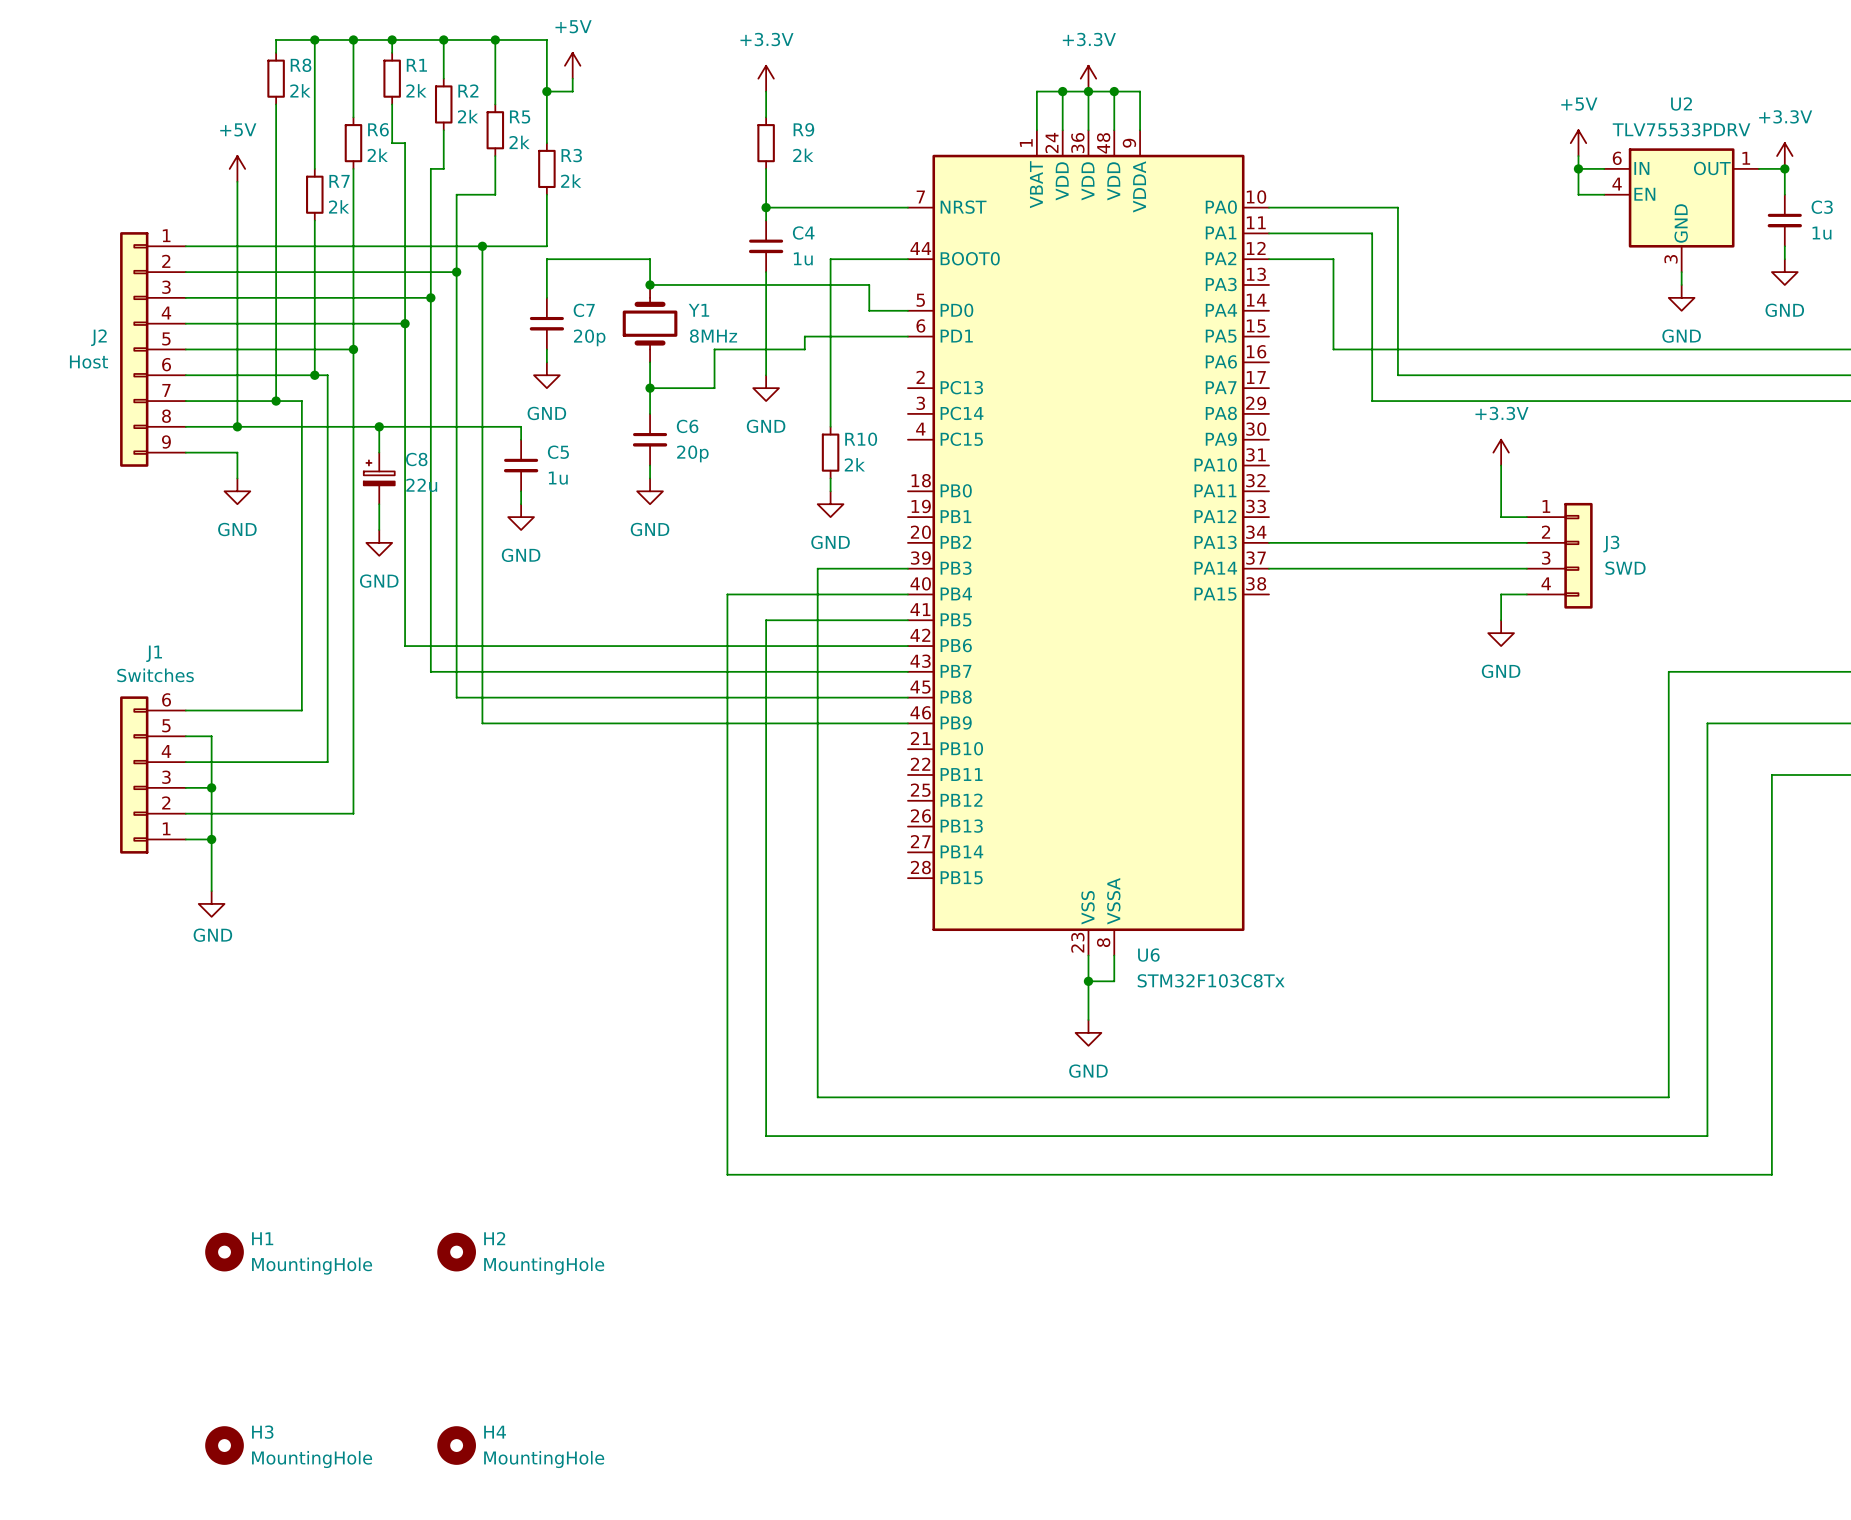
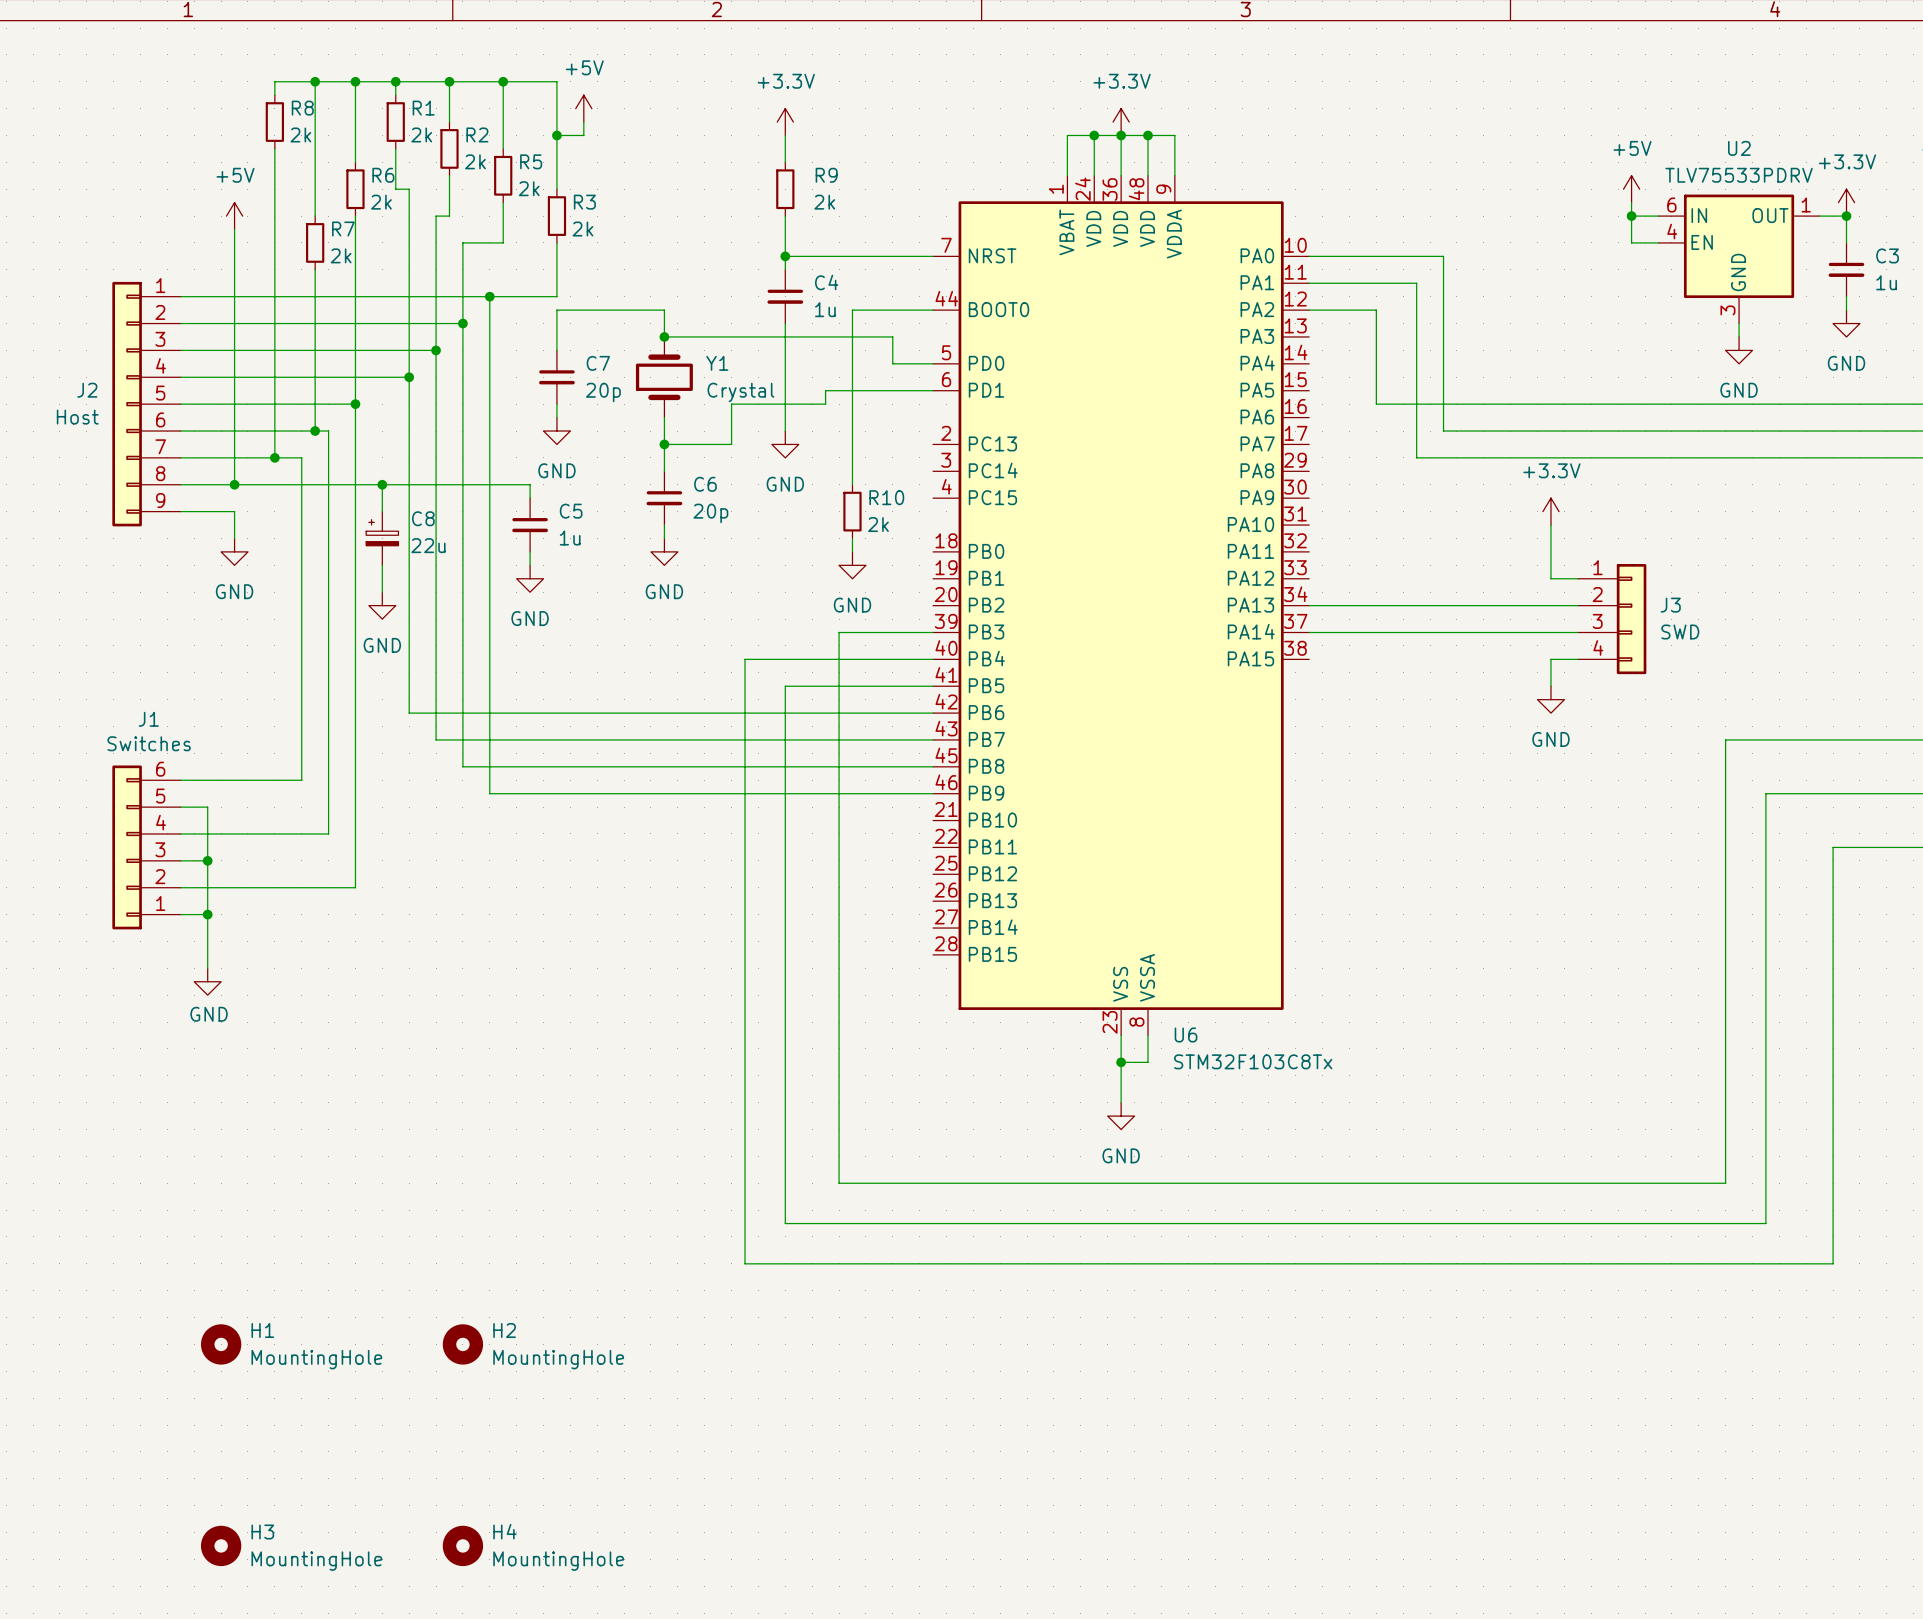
Y1 value: 8MHz (713, 336) -> Crystal (740, 392)

